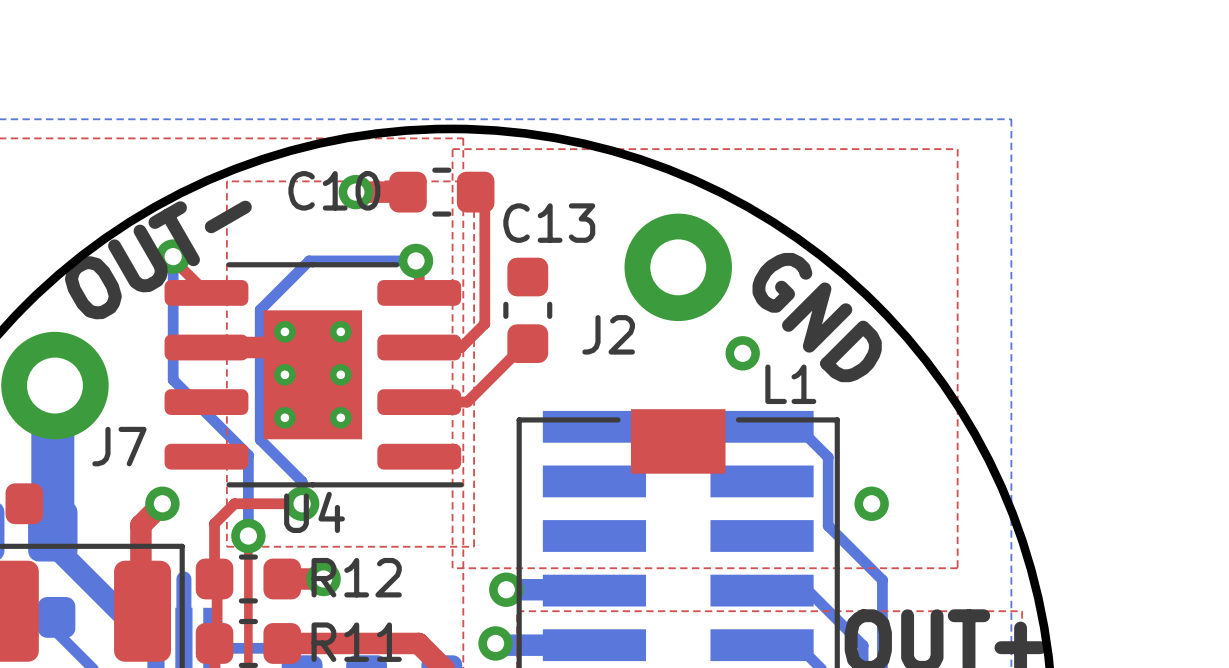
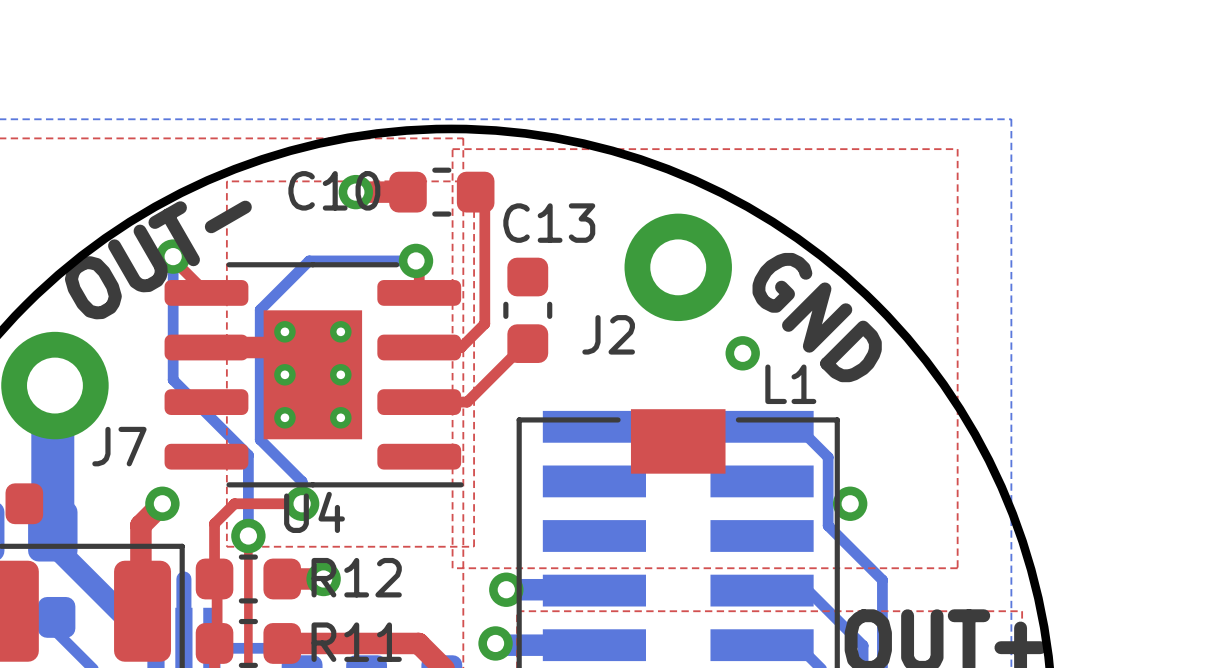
via position: (871, 503) -> (850, 503)

